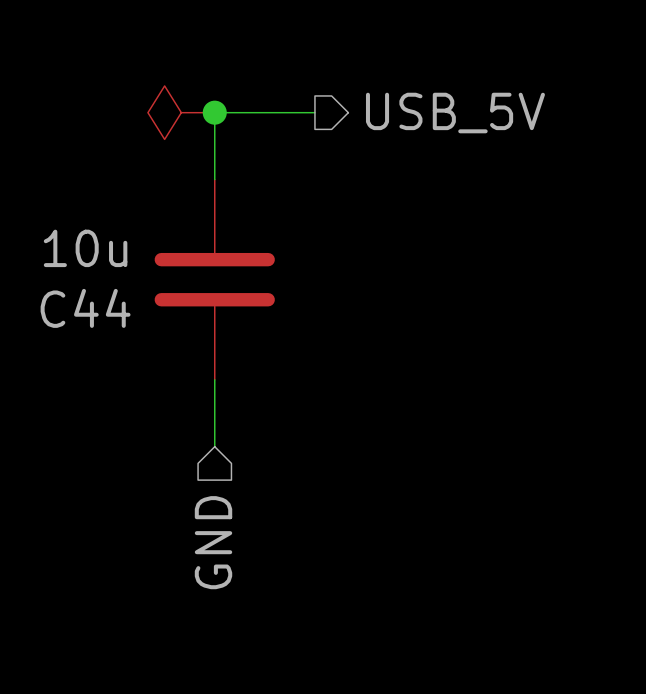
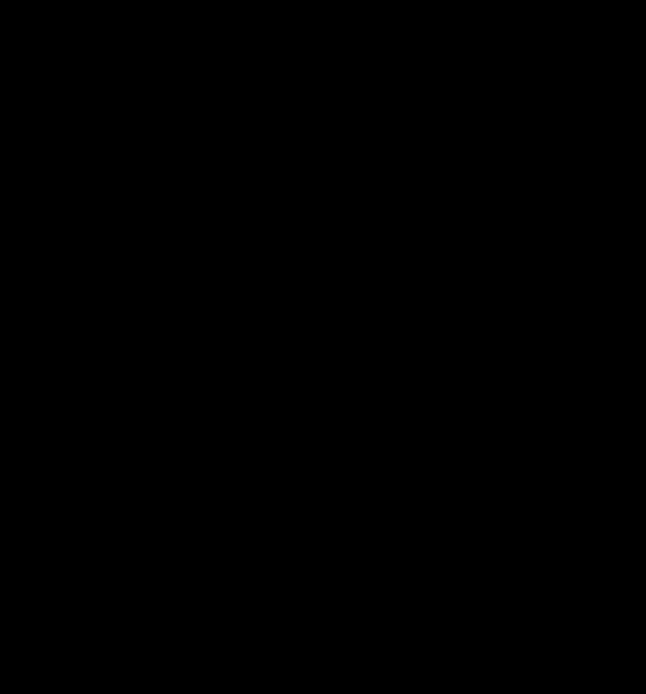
power symbol: (181, 112) -> none
junction: (214, 112) -> none
wire: (314, 112) (214, 112) (214, 179) -> none
hierarchical label: USB_5V (455, 113) -> none
C44: 10u (214, 279) -> none
wire: (214, 379) (214, 446) -> none
hierarchical label: GND (213, 542) -> none

